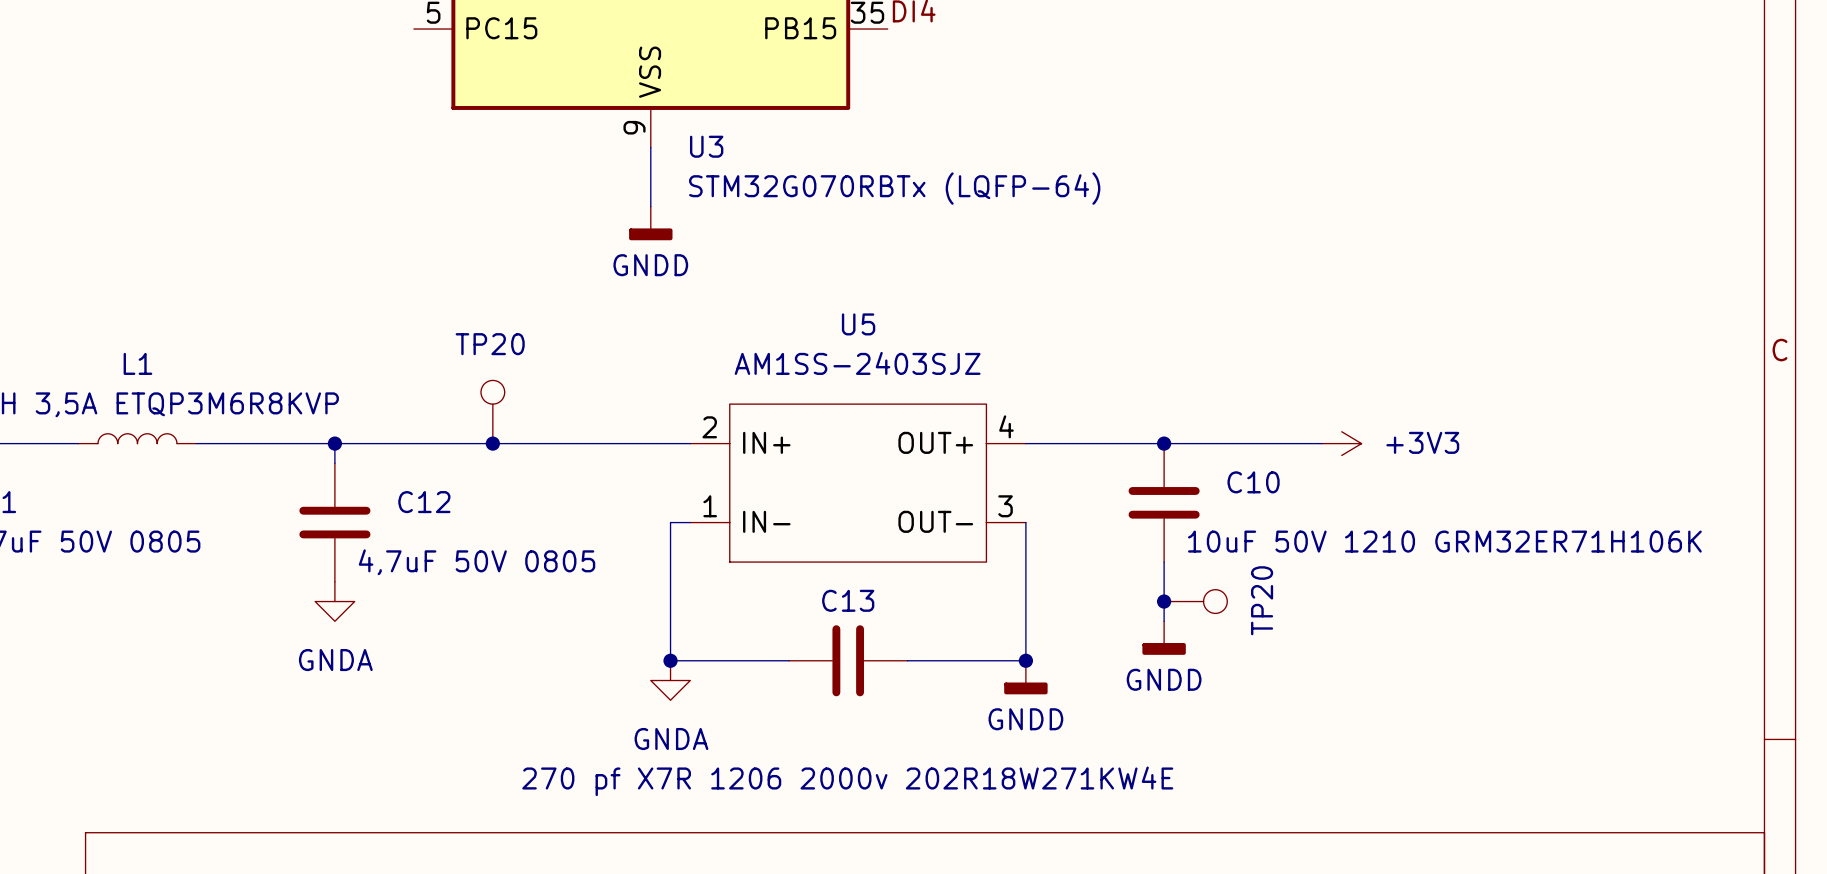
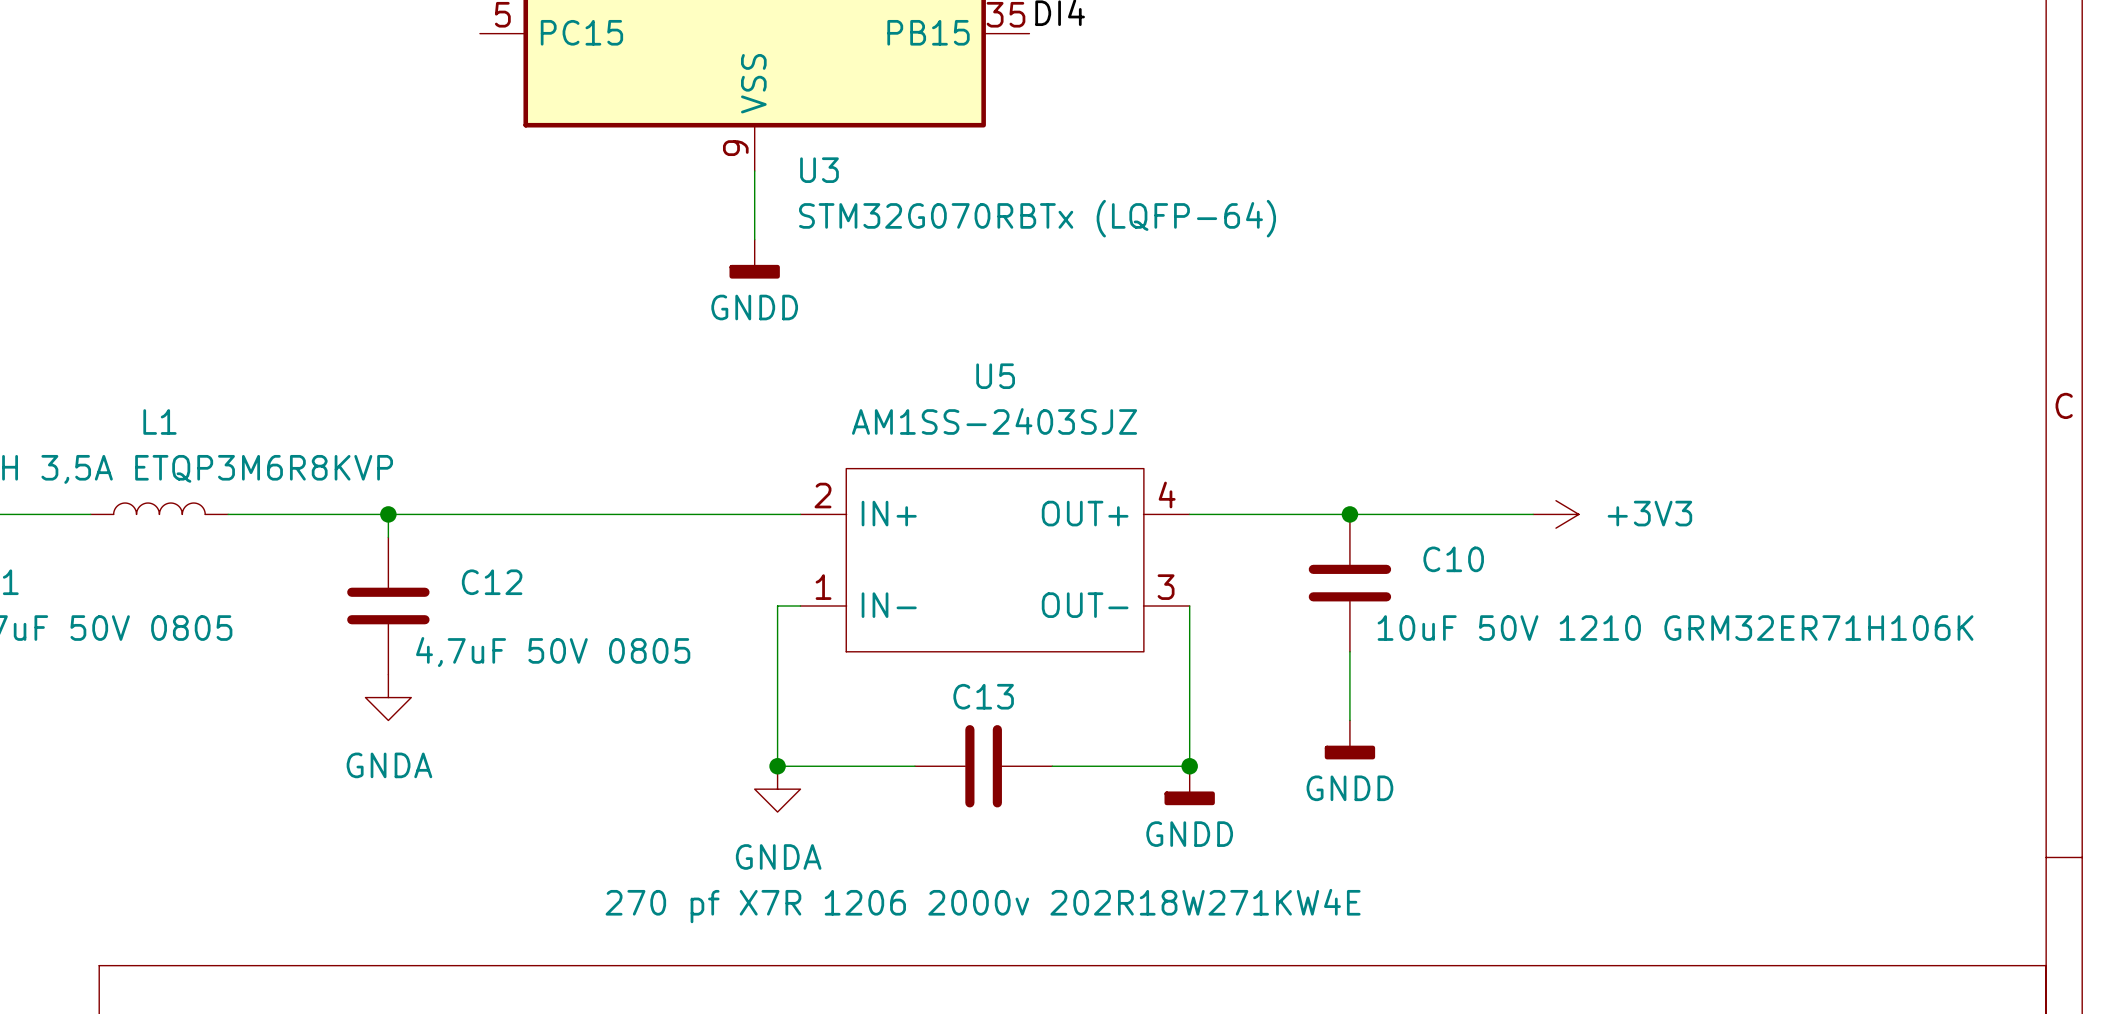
TP20: (492, 412) -> none
junction: (492, 443) -> none
junction: (1164, 601) -> none
TP20: (1195, 601) -> none

